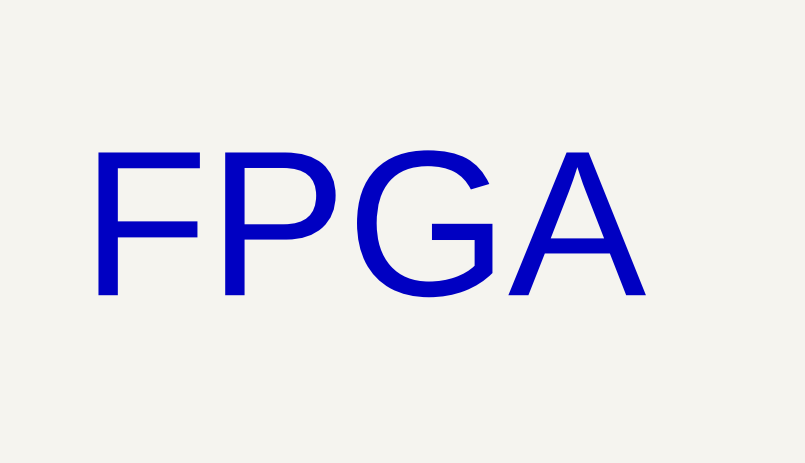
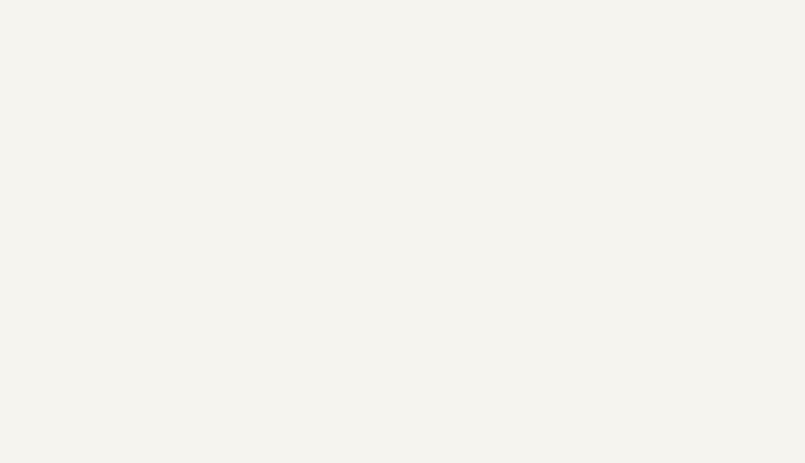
text: FPGA (372, 223) -> none

